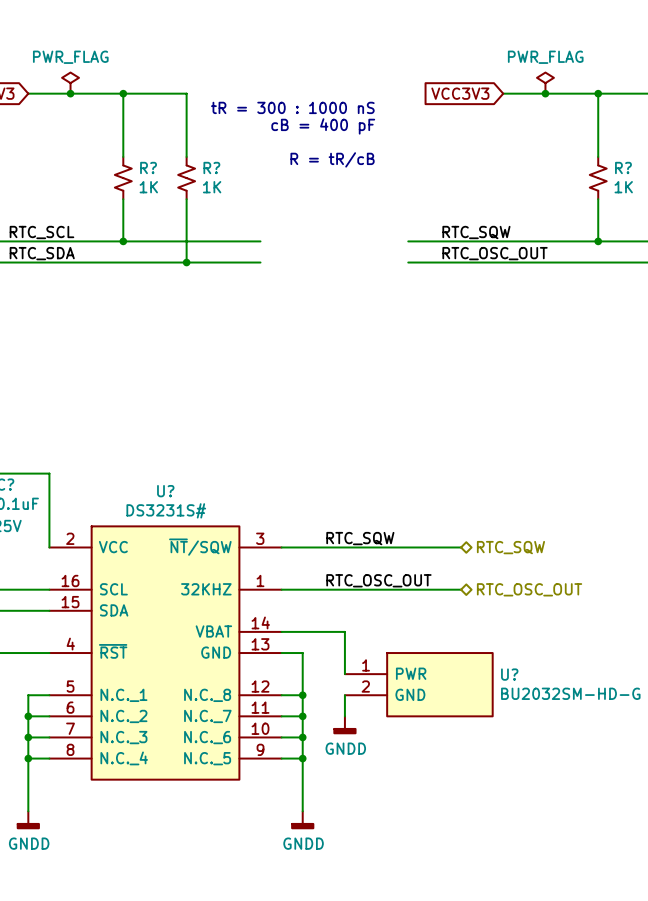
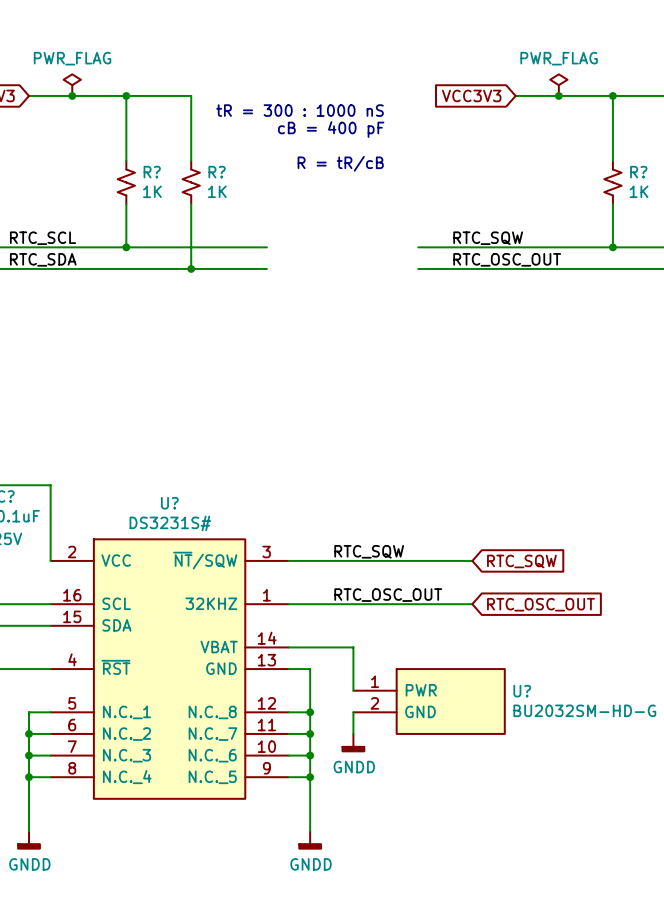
global label: none -> RTC_SQW (521, 561)
hierarchical label: RTC_SQW (510, 547) -> none
hierarchical label: RTC_OSC_OUT (529, 589) -> none
global label: none -> RTC_OSC_OUT (540, 604)

